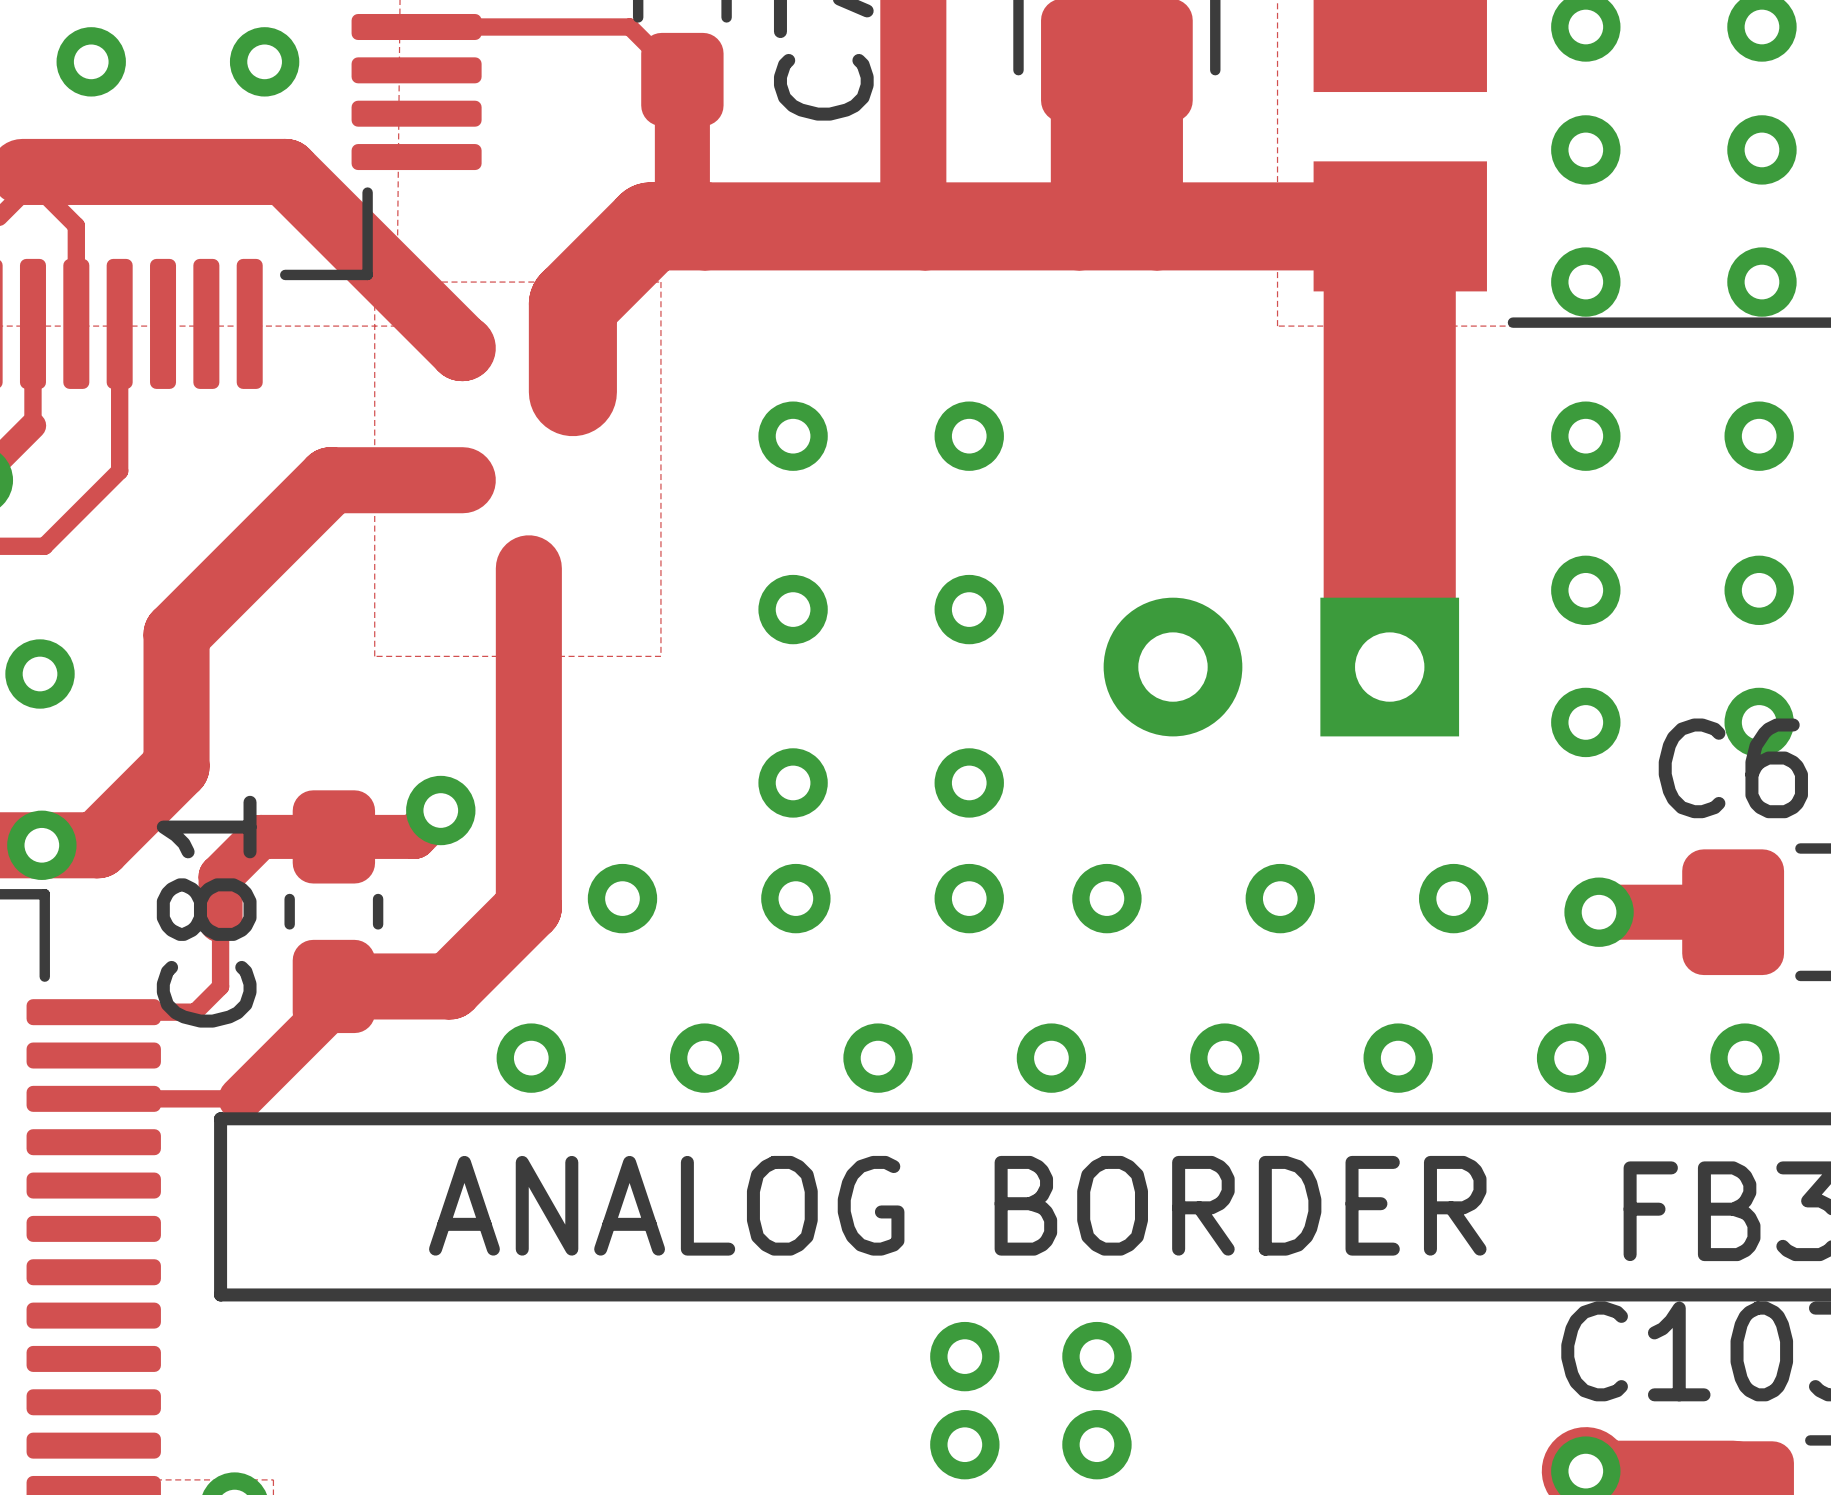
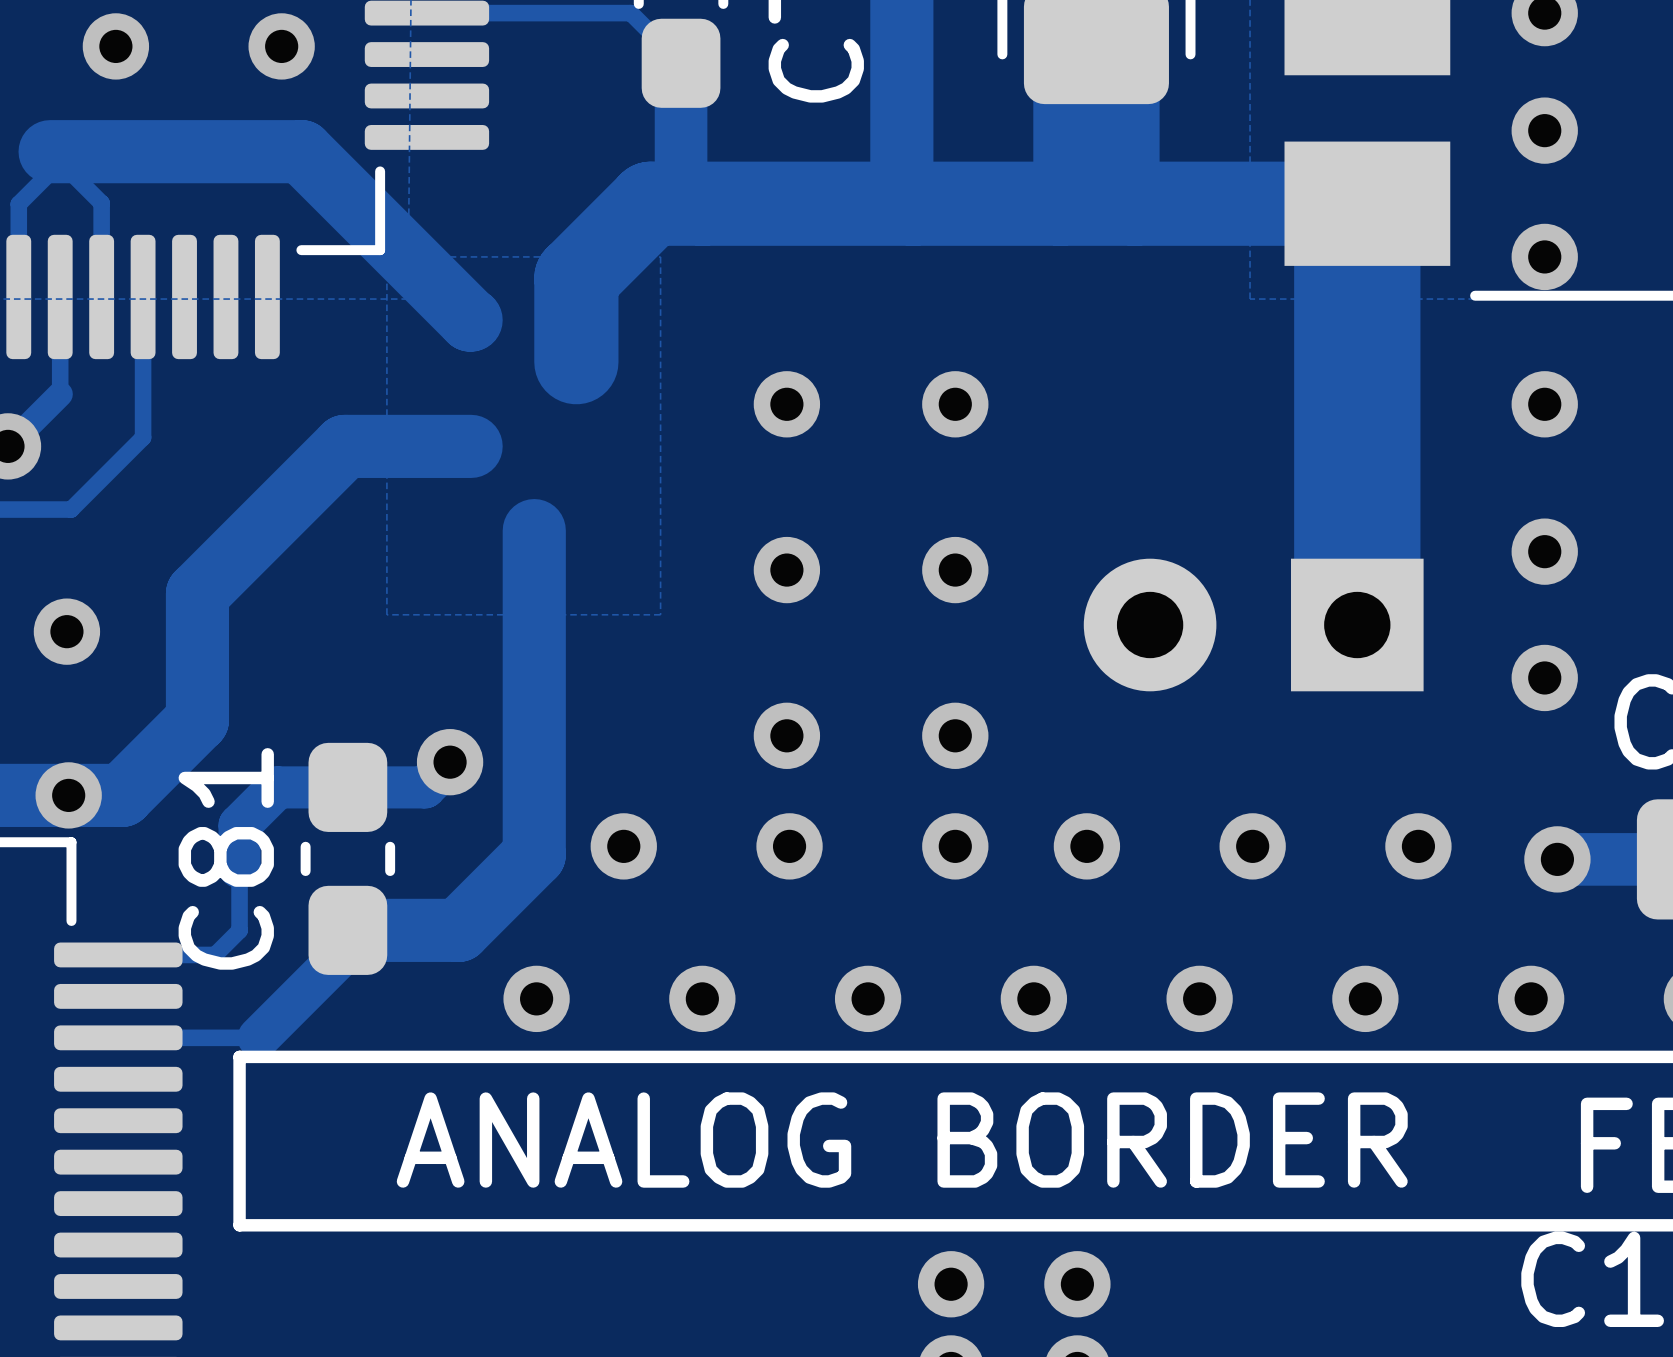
text position: ANALOG BORDER (957, 1205) -> ANALOG BORDER (902, 1140)

